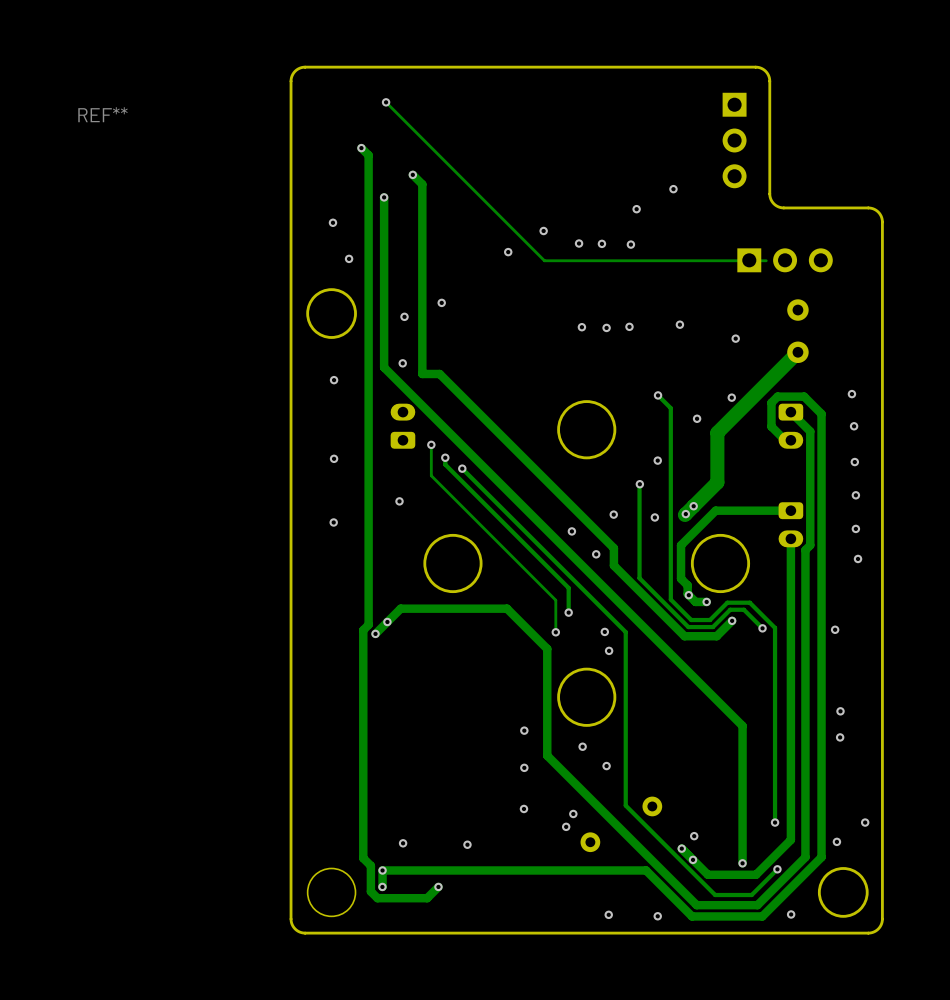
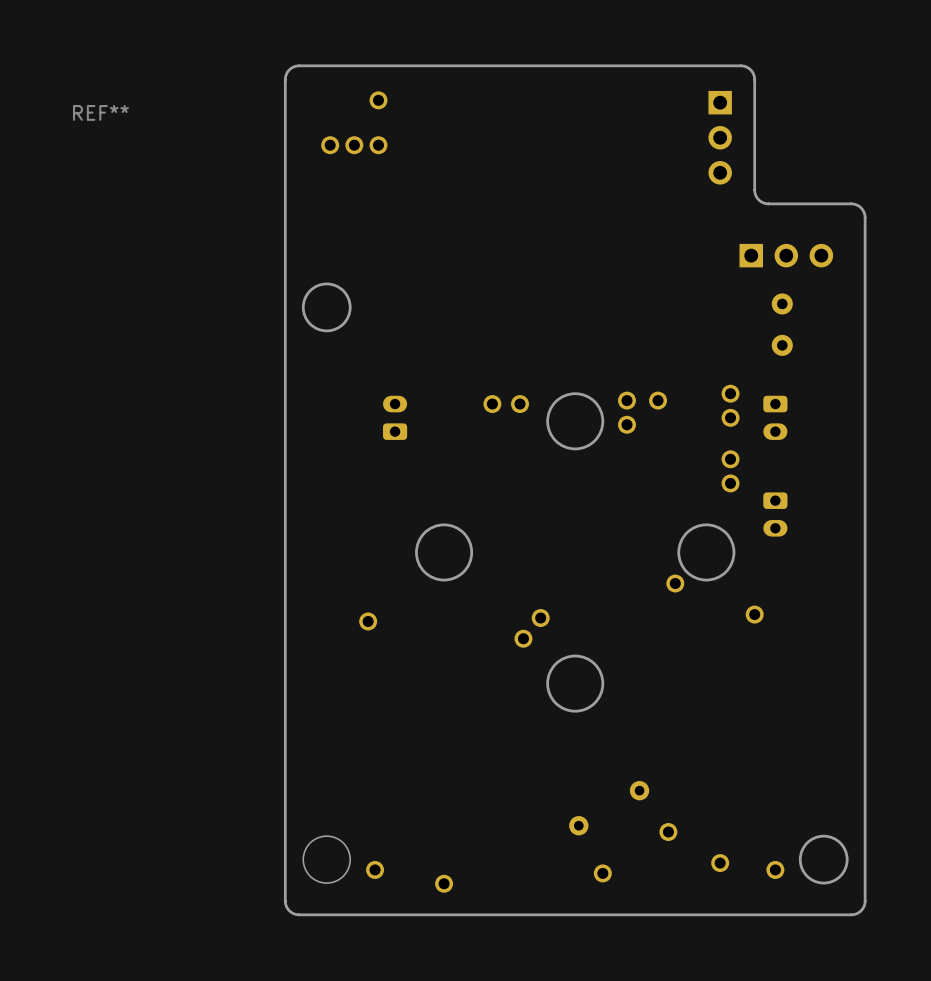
REF** footprint: [289, 65, 884, 935] -> [283, 64, 867, 917]
track: (386, 102) (544, 260) (766, 260) -> none
part: none -> (378, 100)
via: (386, 102) -> none
part: none -> (330, 145)
track: (361, 148) (368, 155) (368, 624) (363, 630) (363, 858) (370, 865) (370, 891) (377, 898) (427, 898) (438, 886) -> none
part: none -> (354, 145)
via: (361, 148) -> none
part: none -> (378, 145)
track: (412, 174) (422, 184) (422, 373) (439, 373) (613, 548) (613, 565) (684, 636) (716, 636) (732, 620) -> none
via: (412, 174) -> none
via: (673, 189) -> none
track: (384, 197) (384, 367) (742, 725) (742, 863) -> none
via: (384, 197) -> none
via: (636, 209) -> none
via: (332, 222) -> none
via: (543, 230) -> none
via: (579, 243) -> none
via: (601, 243) -> none
via: (630, 244) -> none
via: (508, 252) -> none
via: (349, 258) -> none
part position: (785, 260) -> (786, 255)
via: (441, 302) -> none
via: (404, 316) -> none
via: (679, 324) -> none
via: (629, 326) -> none
via: (581, 327) -> none
via: (606, 327) -> none
via: (735, 338) -> none
track: (797, 352) (717, 432) (717, 482) (684, 514) -> none
via: (402, 363) -> none
via: (334, 380) -> none
via: (851, 394) -> none
track: (658, 395) (670, 408) (670, 599) (691, 620) (710, 620) (727, 602) (749, 602) (775, 627) (775, 822) -> none
via: (658, 395) -> none
via: (731, 397) -> none
part: none -> (730, 393)
part: none -> (626, 400)
part: none -> (658, 400)
part: none -> (492, 404)
part: none -> (520, 404)
track: (790, 412) (810, 431) (810, 545) (805, 550) (805, 857) (757, 905) (696, 905) (547, 755) (547, 648) (507, 608) (400, 608) (375, 633) -> none
via: (697, 418) -> none
part: none -> (730, 417)
via: (854, 426) -> none
part: none -> (626, 424)
track: (790, 440) (785, 440) (771, 426) (771, 402) (777, 396) (804, 396) (821, 413) (821, 857) (762, 916) (692, 916) (646, 870) (382, 870) (382, 886) -> none
track: (431, 444) (431, 475) (555, 600) (555, 632) -> none
via: (431, 444) -> none
track: (445, 457) (445, 464) (568, 588) (568, 612) -> none
via: (445, 457) -> none
via: (334, 458) -> none
via: (657, 460) -> none
via: (854, 462) -> none
track: (462, 468) (625, 632) (625, 805) (715, 895) (751, 895) (777, 869) -> none
via: (462, 468) -> none
part: none -> (730, 459)
track: (639, 484) (639, 578) (688, 627) (712, 627) (730, 609) (743, 609) (762, 628) -> none
via: (639, 484) -> none
part: none -> (730, 483)
via: (855, 495) -> none
via: (399, 501) -> none
via: (693, 506) -> none
track: (790, 510) (715, 510) (681, 545) (681, 578) (687, 585) (687, 594) (695, 601) (706, 601) -> none
via: (613, 514) -> none
via: (685, 514) -> none
via: (654, 517) -> none
via: (333, 522) -> none
via: (855, 528) -> none
via: (571, 531) -> none
track: (790, 538) (790, 839) (756, 874) (707, 874) (681, 848) -> none
via: (596, 554) -> none
via: (858, 558) -> none
part: none -> (675, 583)
via: (688, 595) -> none
via: (706, 601) -> none
via: (568, 612) -> none
via: (732, 620) -> none
via: (387, 621) -> none
part: none -> (754, 614)
via: (762, 628) -> none
via: (835, 629) -> none
part: none -> (540, 618)
via: (604, 631) -> none
via: (555, 632) -> none
part: none -> (368, 621)
via: (375, 633) -> none
via: (609, 650) -> none
part: none -> (523, 638)
via: (840, 711) -> none
via: (524, 730) -> none
via: (840, 737) -> none
via: (582, 746) -> none
via: (606, 766) -> none
via: (524, 767) -> none
via: (523, 808) -> none
via: (573, 813) -> none
via: (775, 822) -> none
via: (865, 822) -> none
via: (566, 826) -> none
via: (694, 836) -> none
via: (836, 841) -> none
via: (403, 843) -> none
via: (467, 844) -> none
part: none -> (668, 832)
via: (681, 848) -> none
via: (693, 859) -> none
via: (742, 863) -> none
via: (777, 869) -> none
via: (382, 870) -> none
part: none -> (720, 863)
via: (382, 886) -> none
via: (438, 886) -> none
part: none -> (375, 869)
part: none -> (775, 869)
part: none -> (602, 873)
part: none -> (444, 883)
via: (608, 914) -> none
via: (791, 914) -> none
via: (657, 916) -> none

